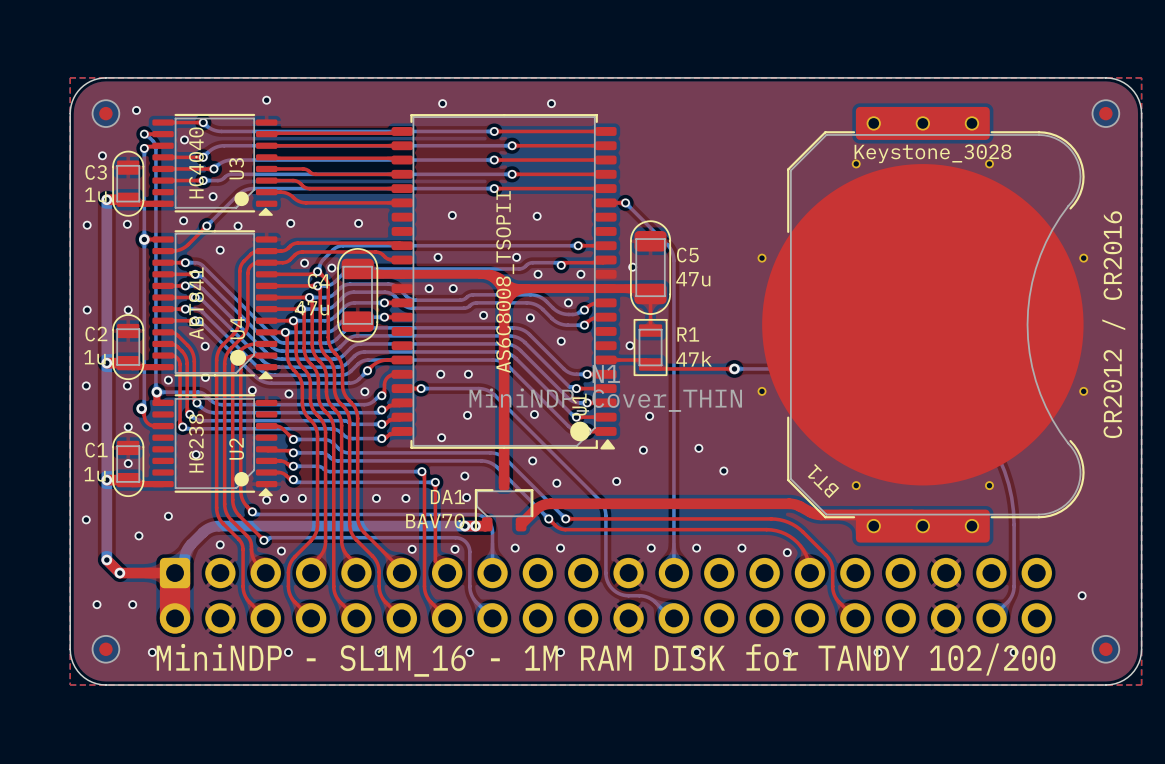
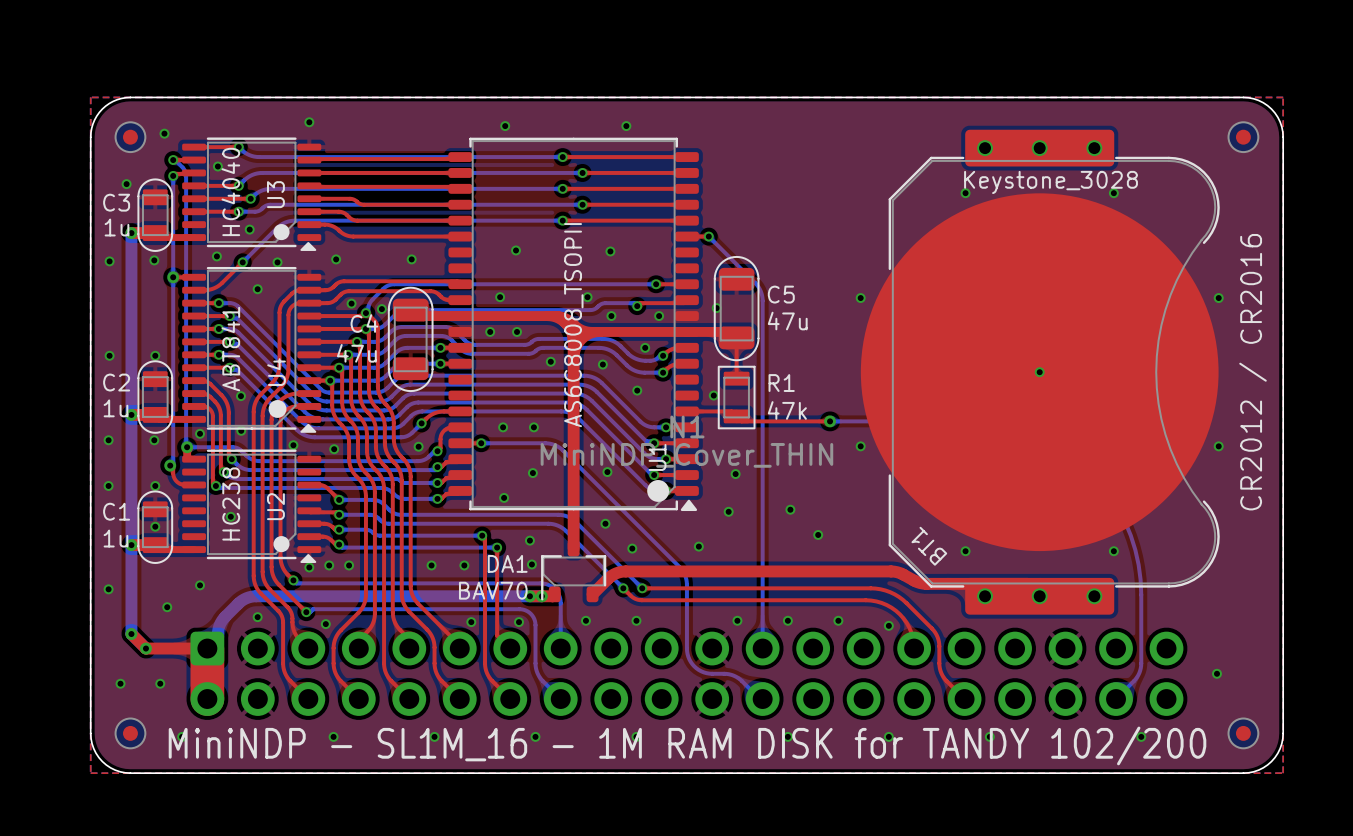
via: none -> (1039, 372)

